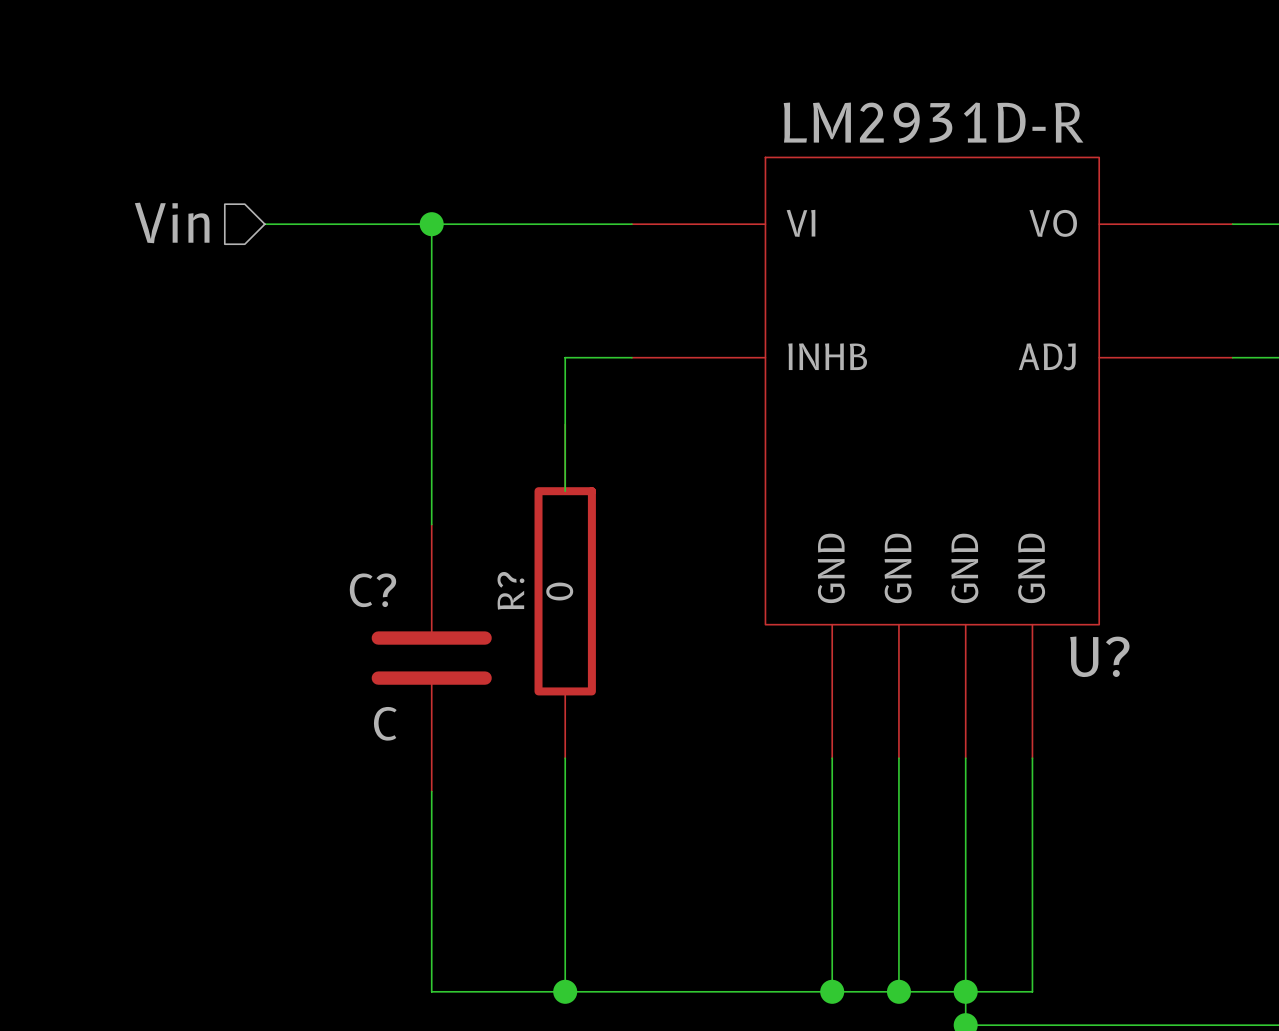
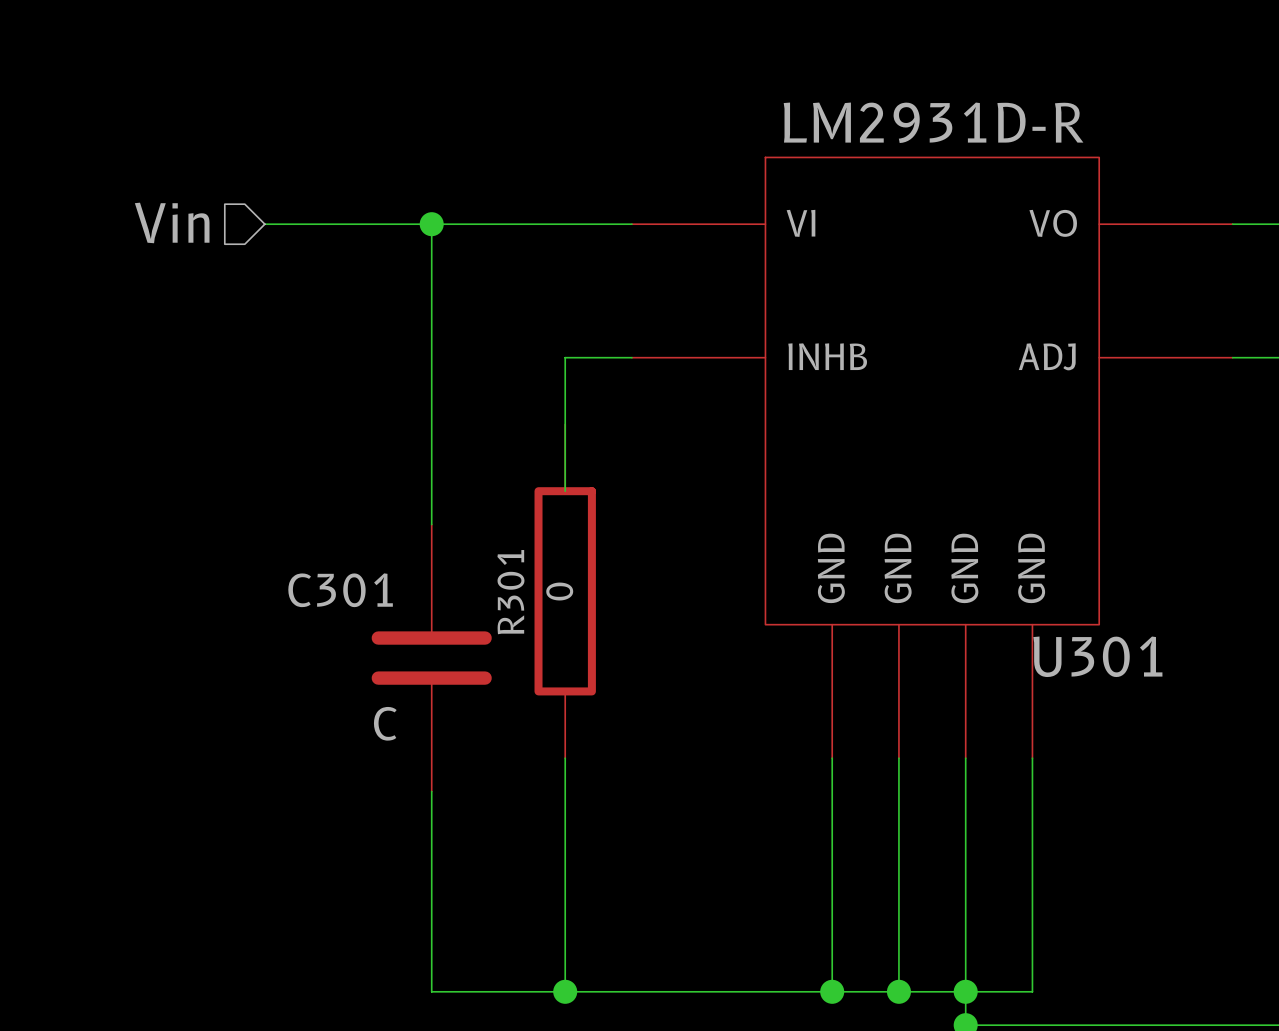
C? name: C? (372, 590) -> C301 (340, 590)
R? name: R? (510, 590) -> R301 (510, 592)
U? name: U? (1099, 656) -> U301 (1097, 656)

